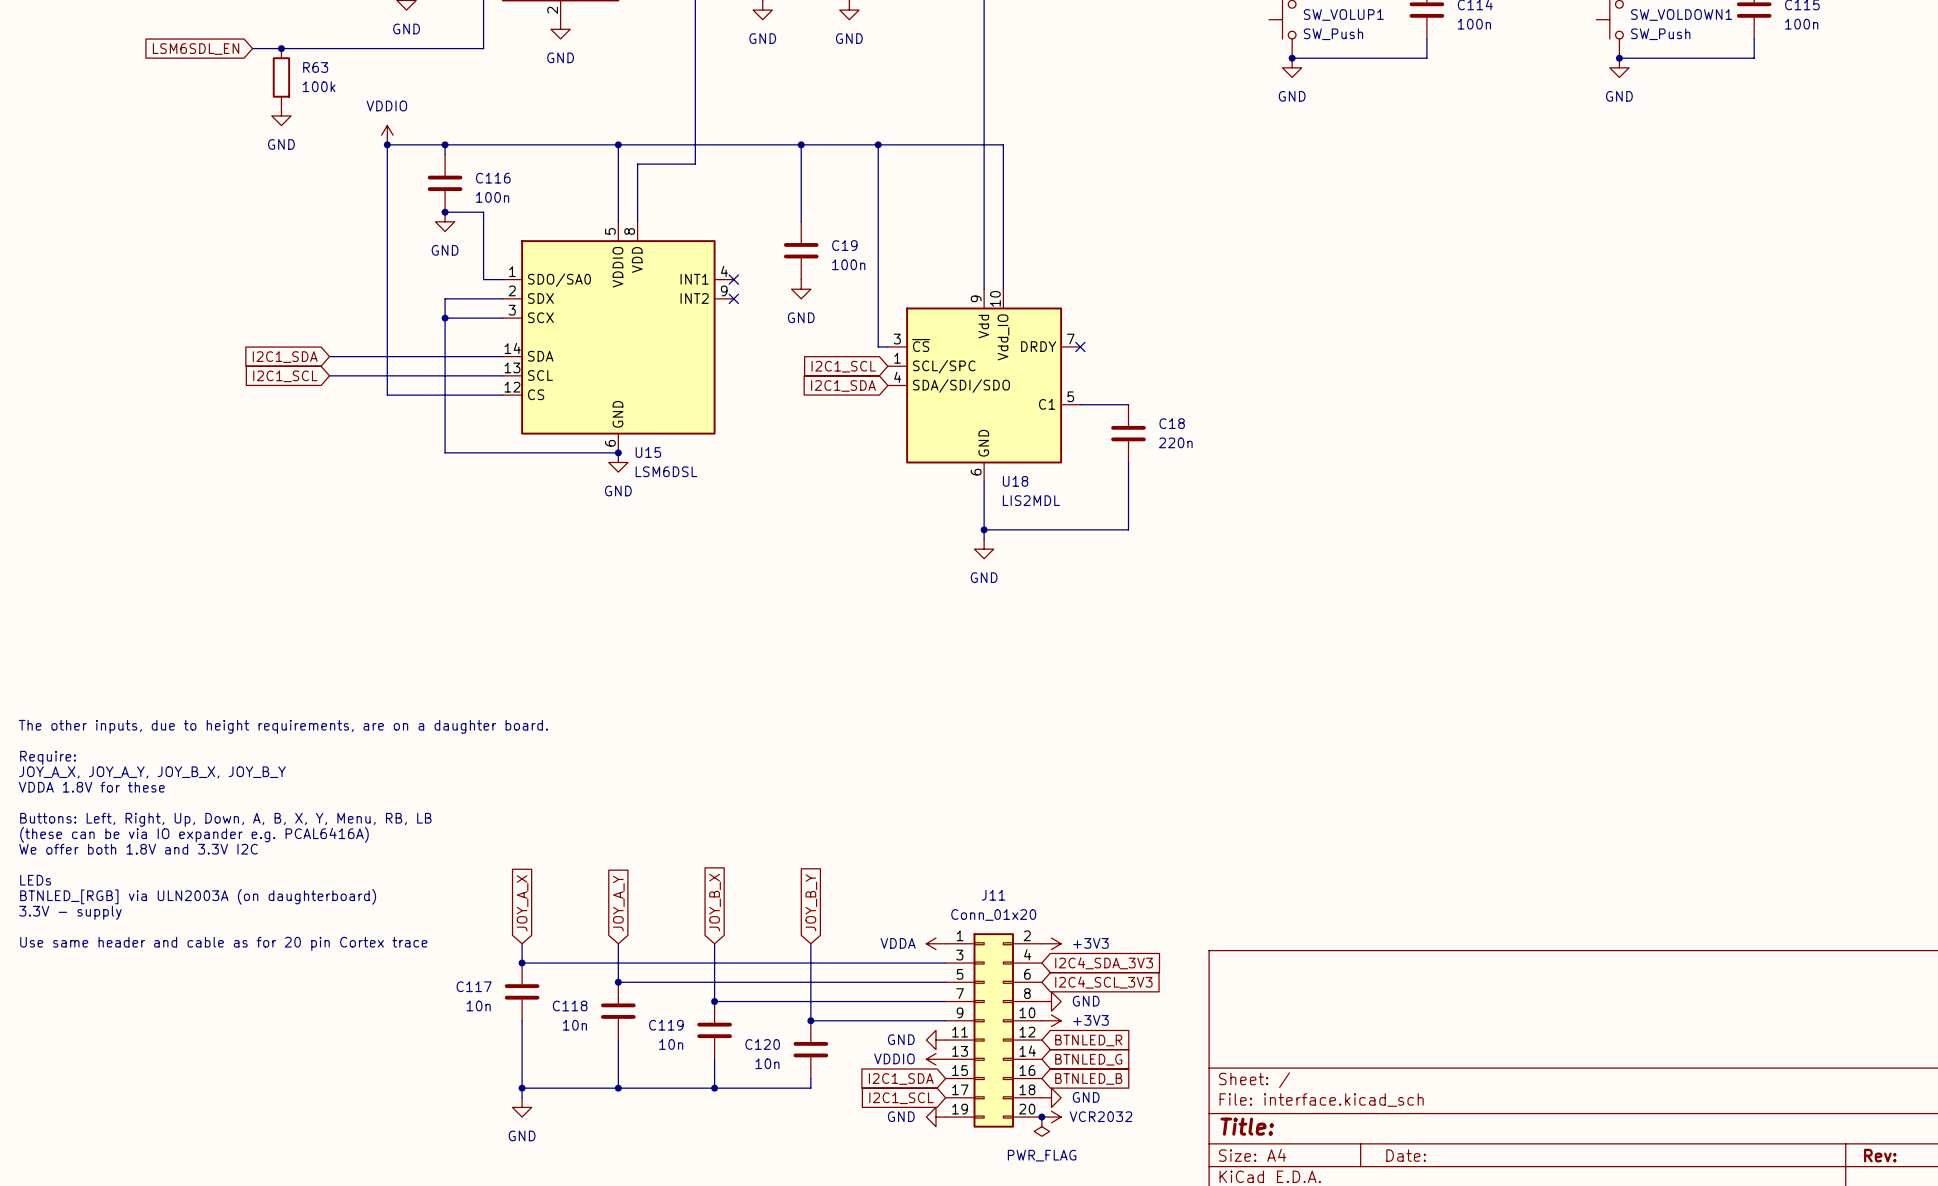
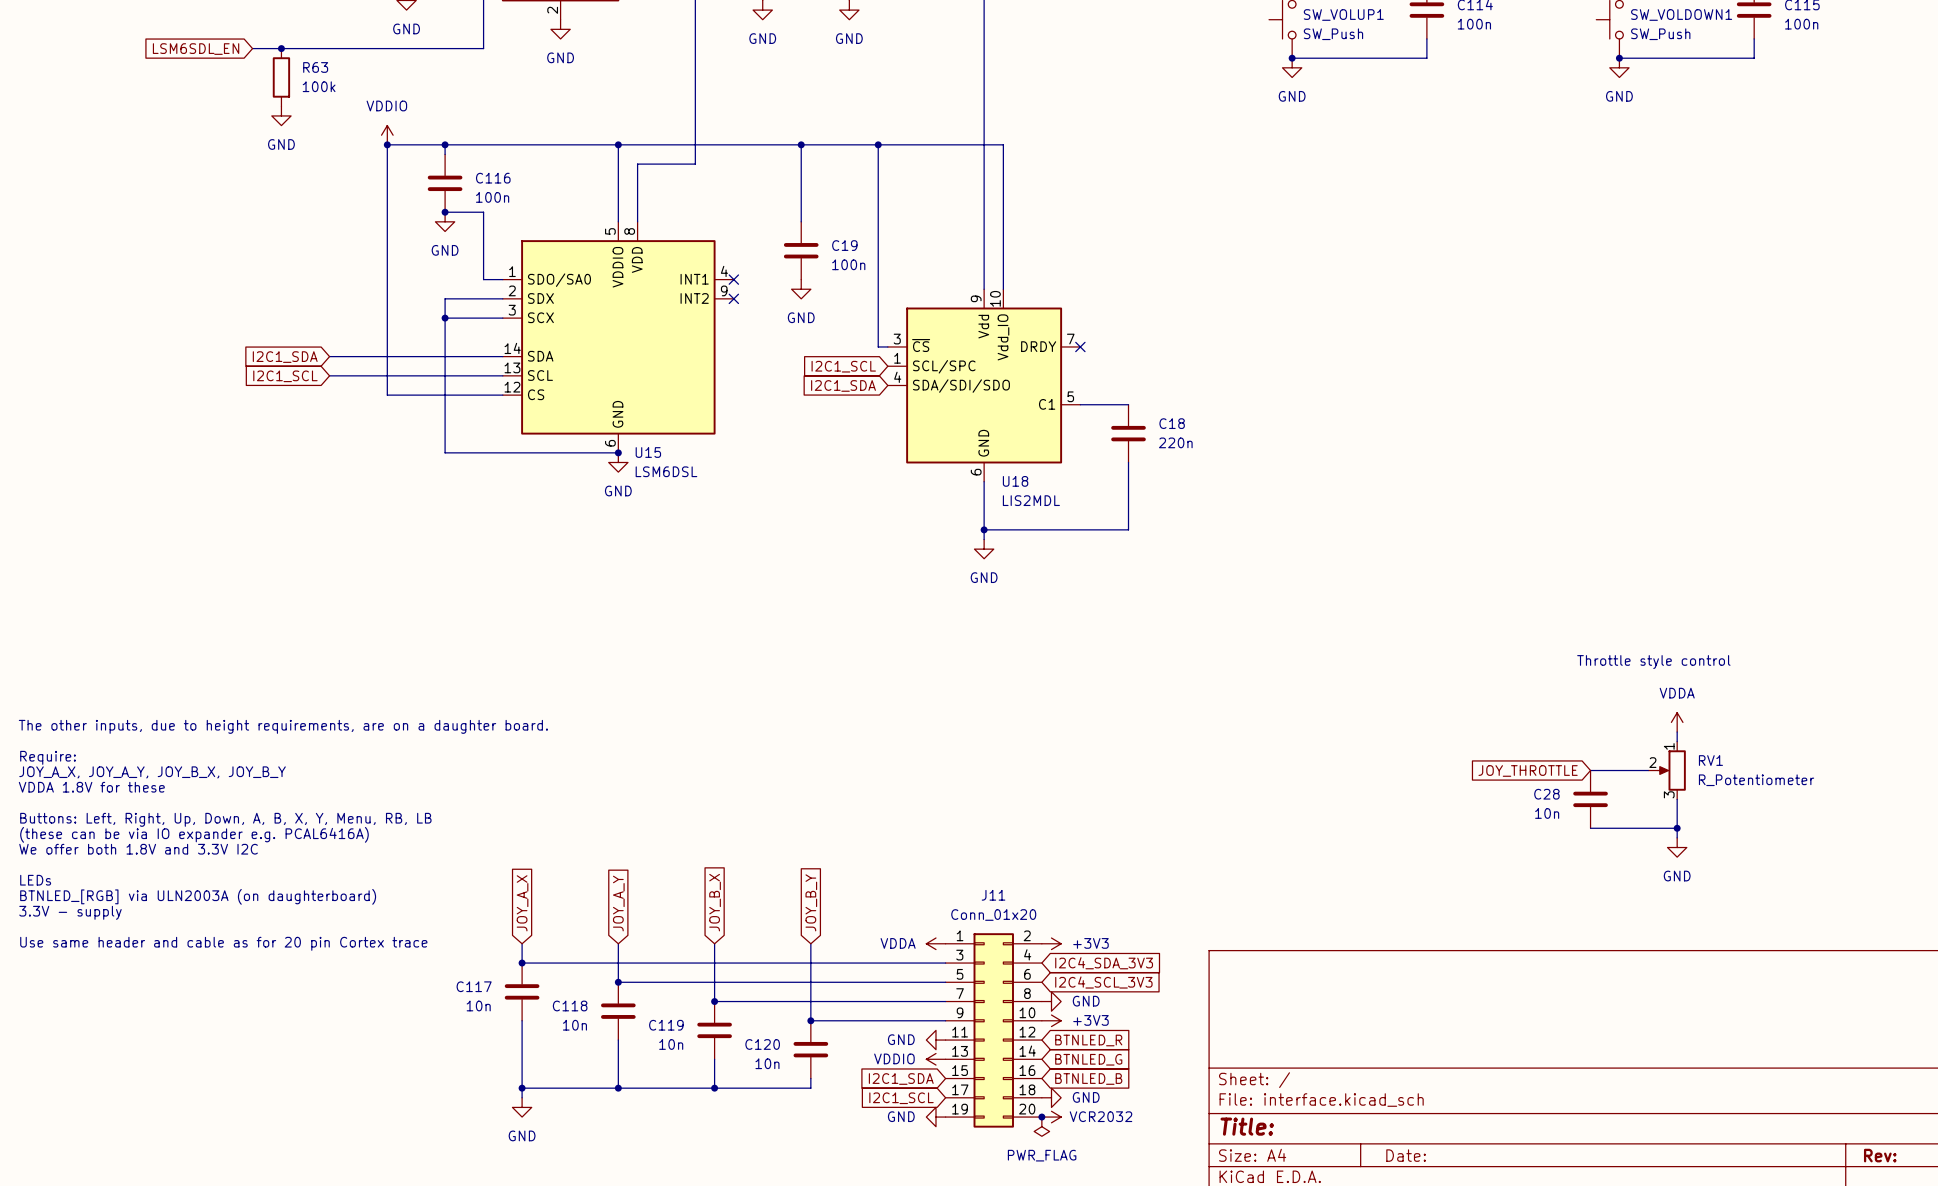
text: none -> Throttle style control (1653, 662)
power symbol: none -> VDDA (1677, 722)
wire: none -> (1677, 732) (1677, 741)
global label: none -> JOY_THROTTLE (1528, 770)
wire: none -> (1590, 770) (1648, 770)
RV1: none -> R_Potentiometer (1667, 770)
C28: none -> 10n (1590, 799)
wire: none -> (1677, 799) (1677, 837)
wire: none -> (1590, 828) (1677, 828)
junction: none -> (1677, 828)
power symbol: none -> GND (1677, 847)

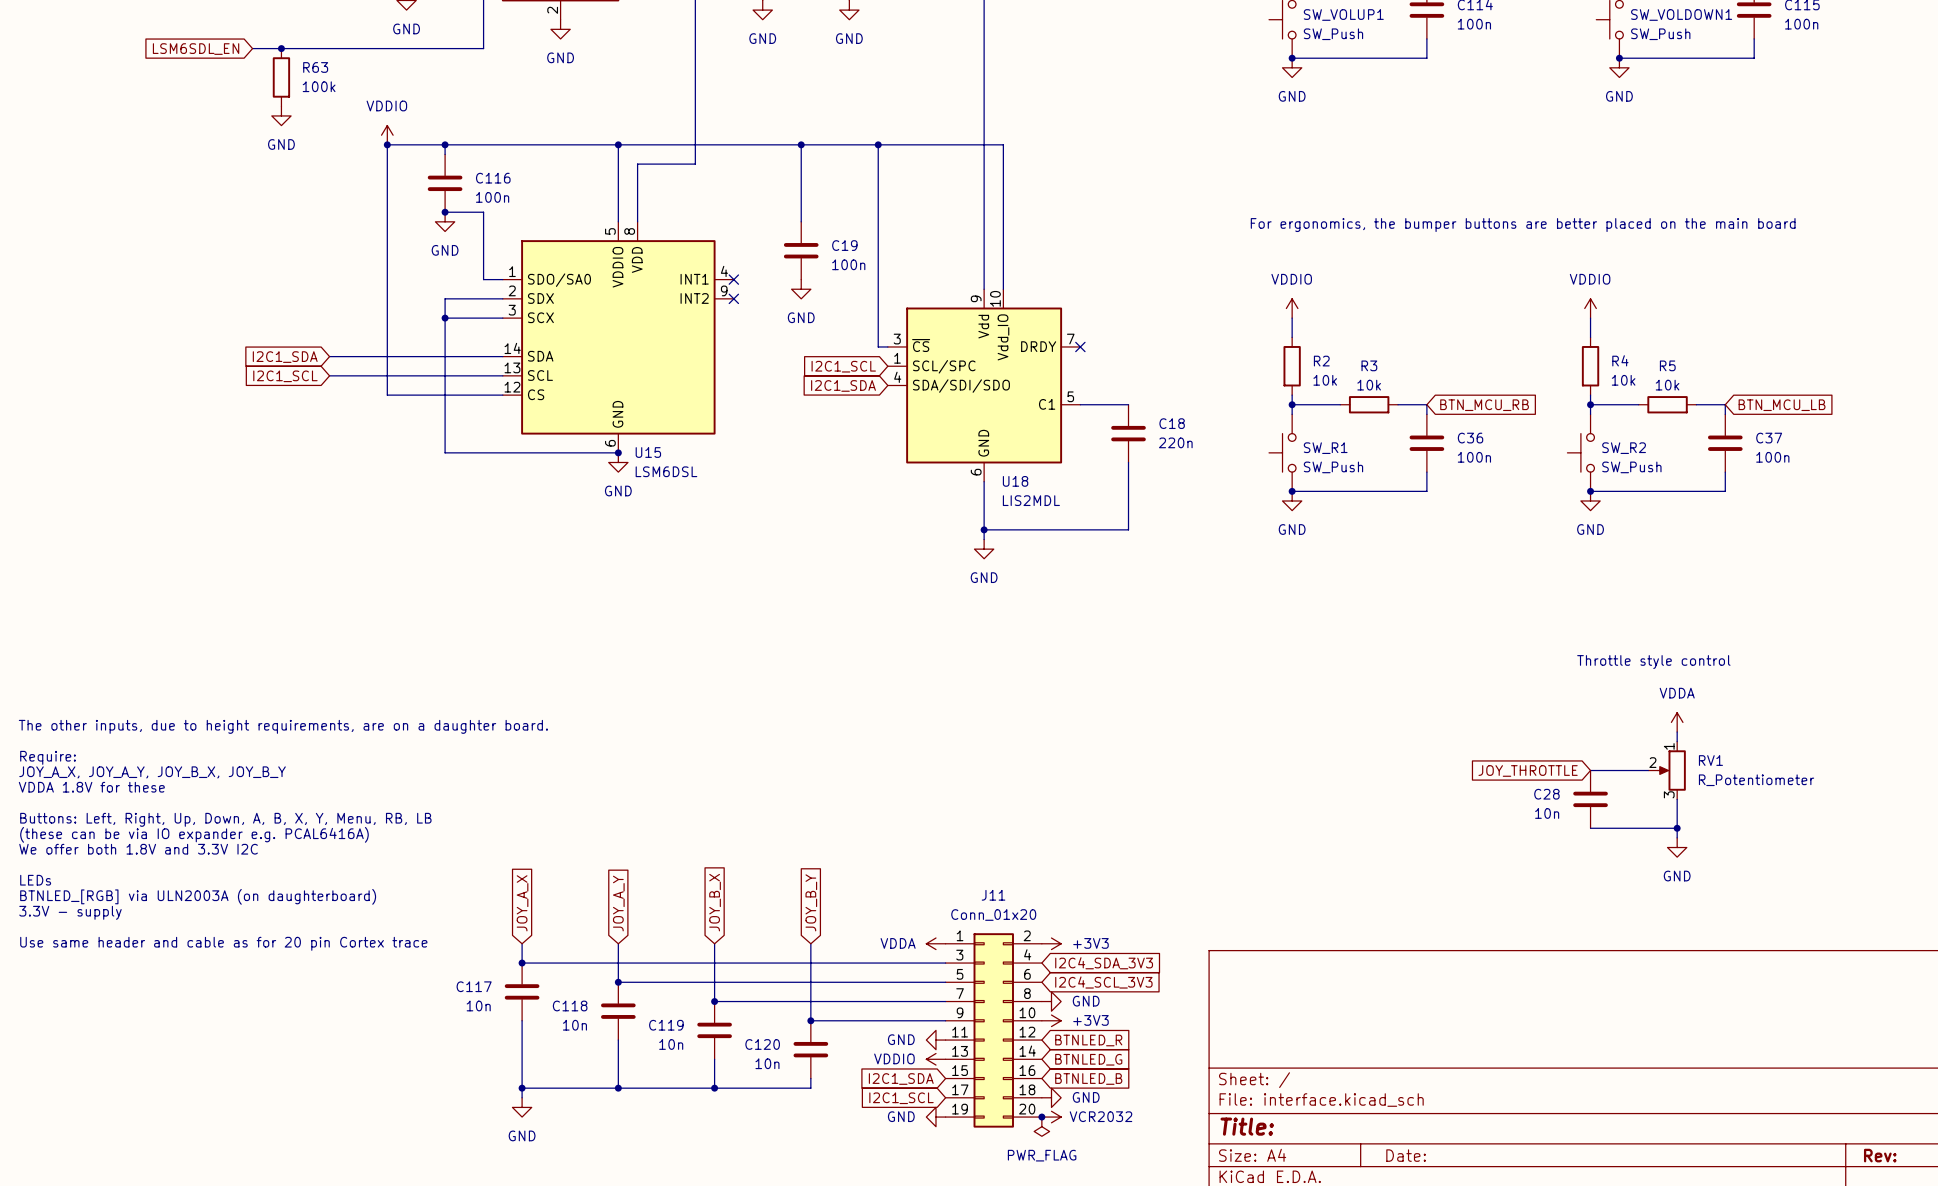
text: none -> For ergonomics, the bumper buttons are better placed on the main board (1523, 225)
power symbol: none -> VDDIO (1292, 308)
power symbol: none -> VDDIO (1590, 308)
wire: none -> (1292, 318) (1292, 337)
wire: none -> (1590, 318) (1590, 337)
R2: none -> 10k (1292, 366)
R4: none -> 10k (1590, 366)
wire: none -> (1292, 395) (1292, 414)
wire: none -> (1590, 395) (1590, 414)
wire: none -> (1292, 404) (1340, 404)
junction: none -> (1292, 404)
R3: none -> 10k (1369, 404)
wire: none -> (1398, 404) (1426, 404) (1426, 414)
wire: none -> (1590, 404) (1638, 404)
junction: none -> (1590, 404)
R5: none -> 10k (1667, 404)
wire: none -> (1696, 404) (1725, 404) (1725, 414)
global label: none -> BTN_MCU_RB (1484, 405)
global label: none -> BTN_MCU_LB (1782, 405)
C36: none -> 100n (1426, 443)
C37: none -> 100n (1725, 443)
SW_R1: none -> SW_Push (1282, 452)
SW_R2: none -> SW_Push (1580, 452)
wire: none -> (1426, 472) (1426, 491) (1292, 491)
wire: none -> (1725, 472) (1725, 491) (1590, 491)
junction: none -> (1292, 491)
junction: none -> (1590, 491)
power symbol: none -> GND (1292, 500)
power symbol: none -> GND (1590, 500)

